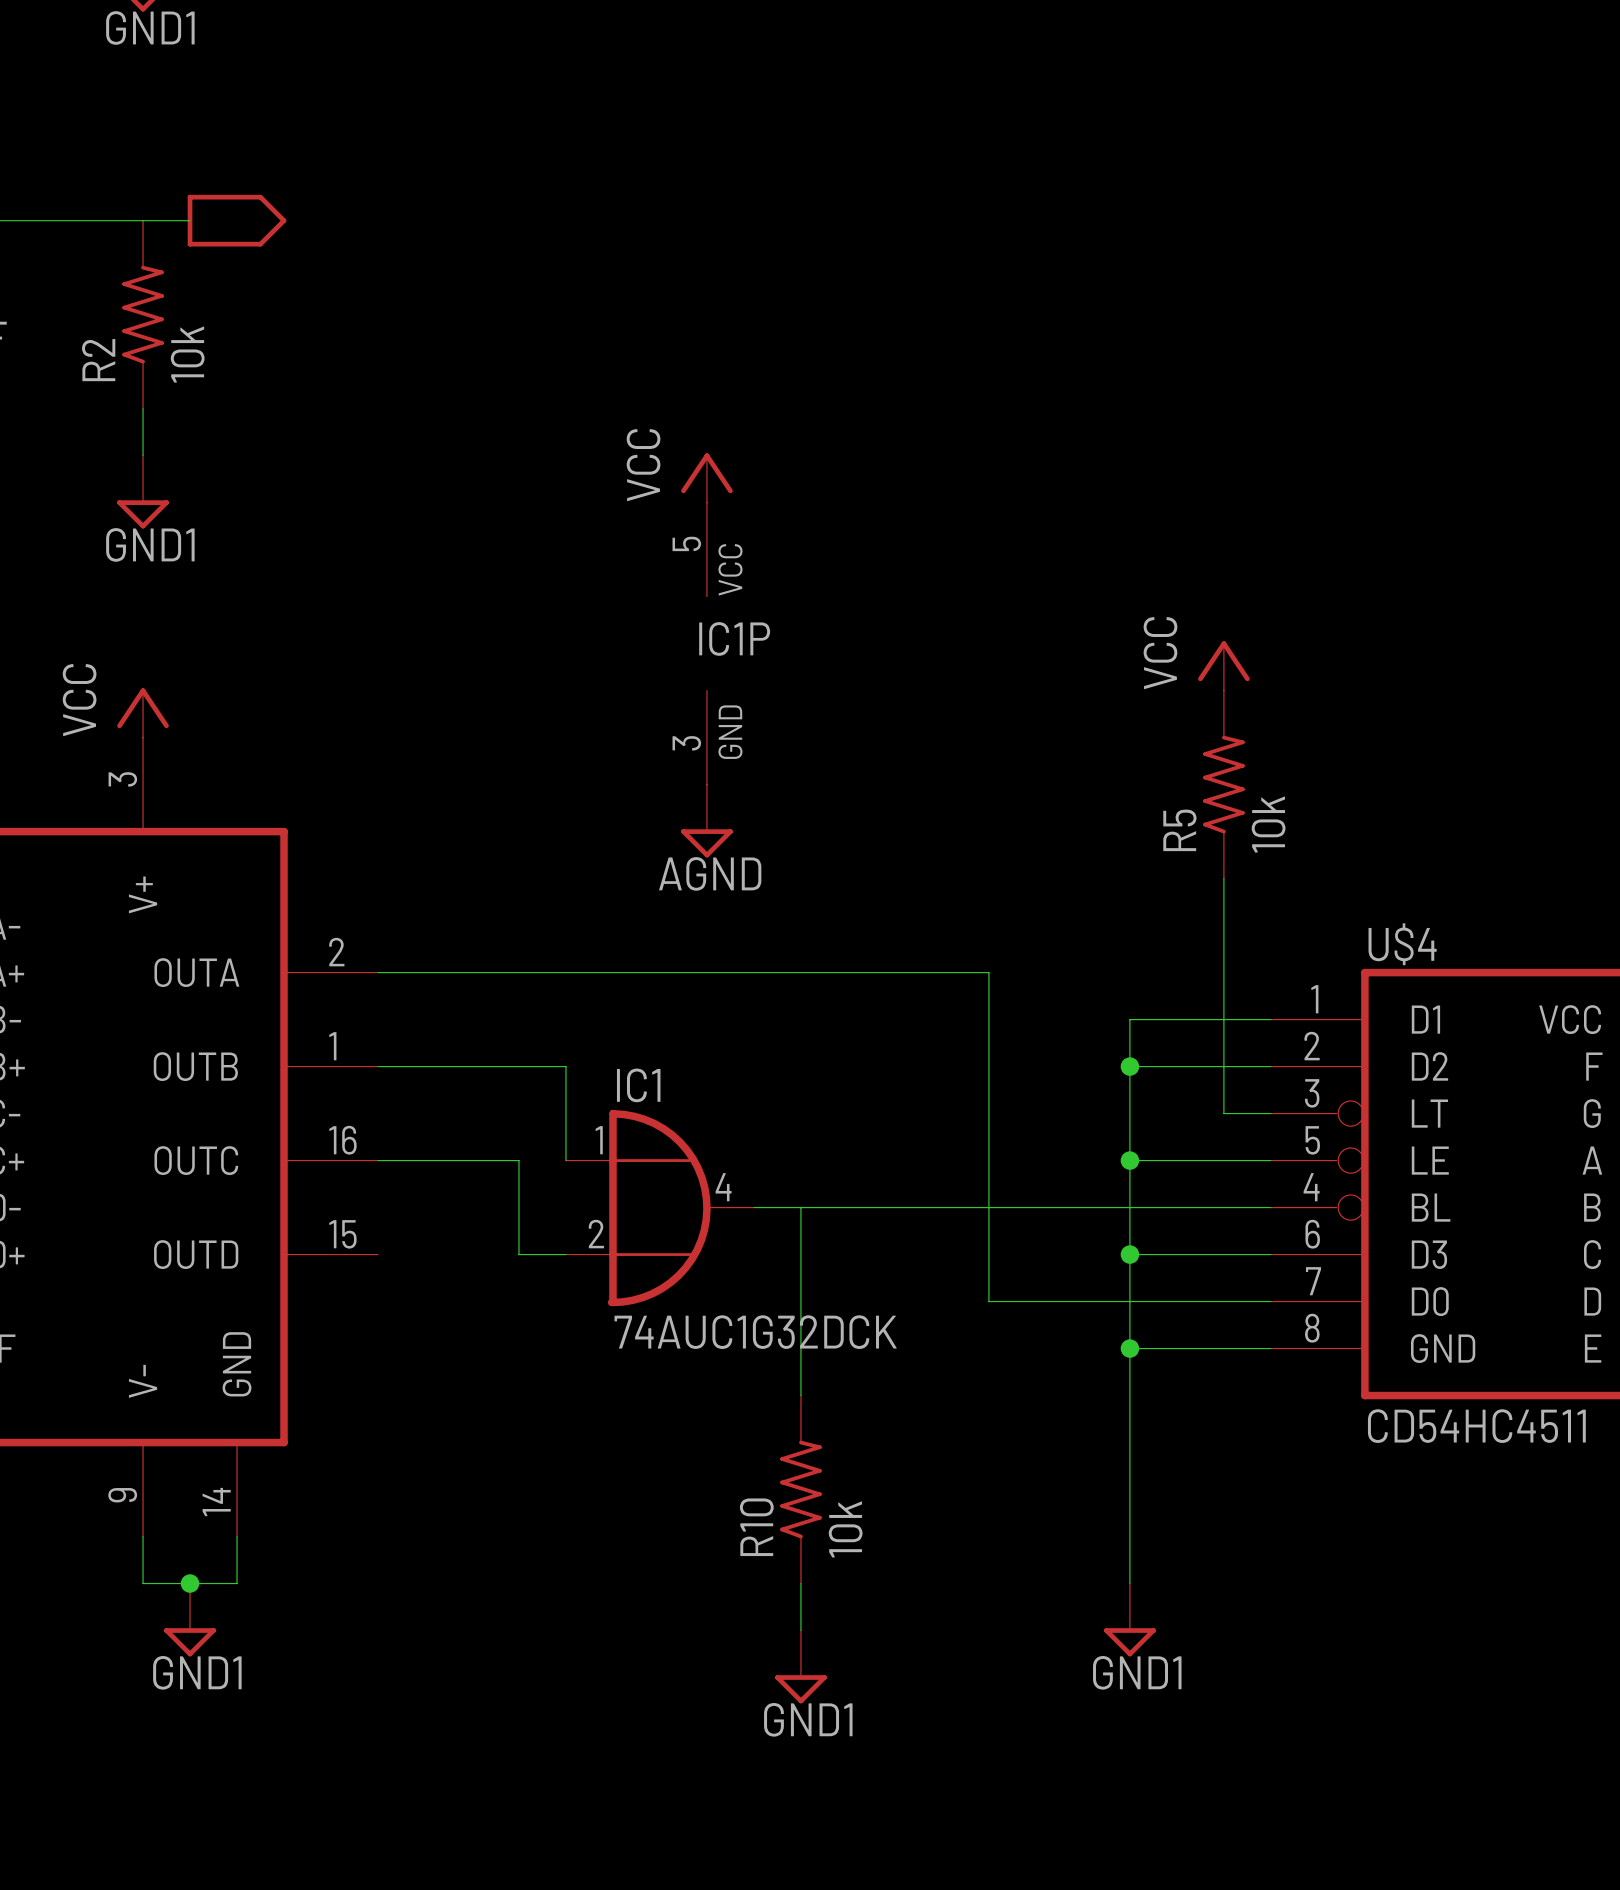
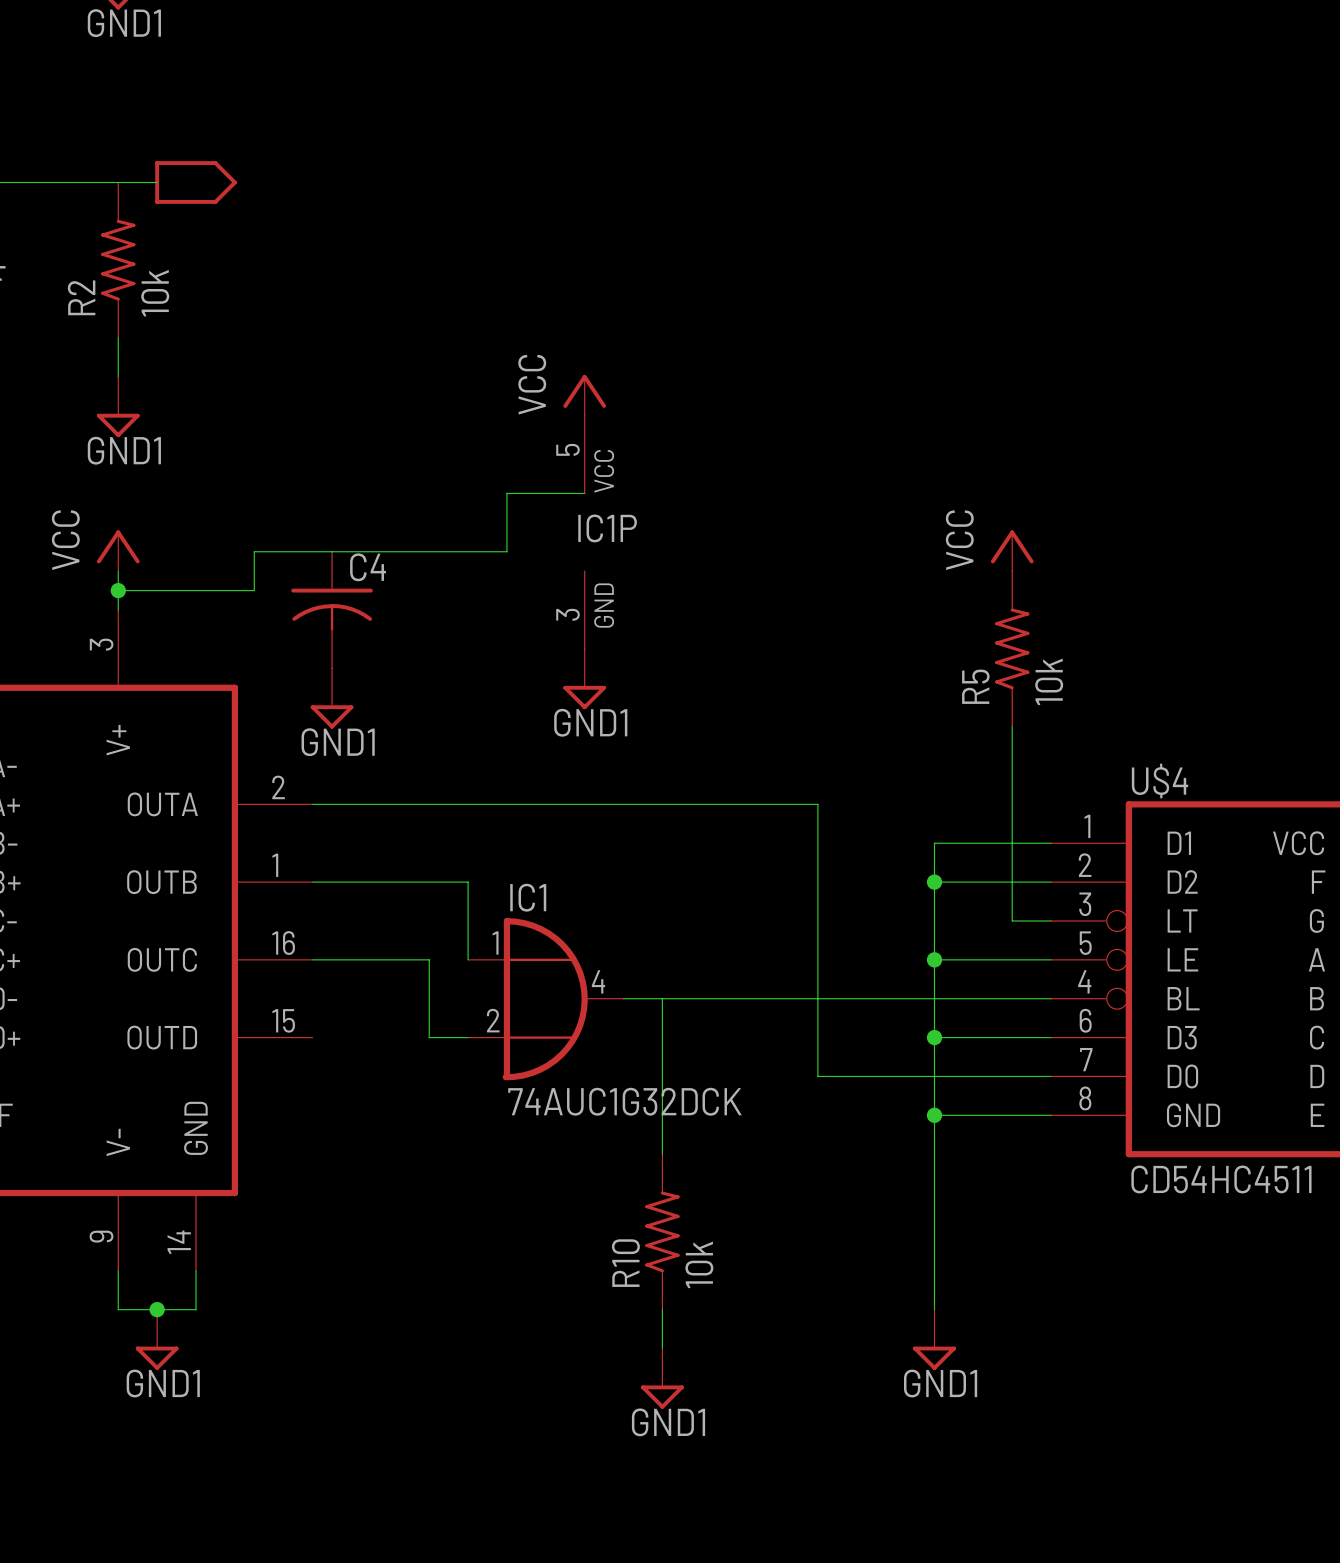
wire: none -> (584, 493) (506, 493) (506, 551) (254, 551) (254, 590) (118, 590)
power symbol position: VCC (143, 712) -> VCC (118, 550)
junction: none -> (118, 590)
C4: none -> (332, 610)
power symbol: AGND (706, 821) -> GND1 (584, 679)
power symbol: none -> GND1 (332, 698)

